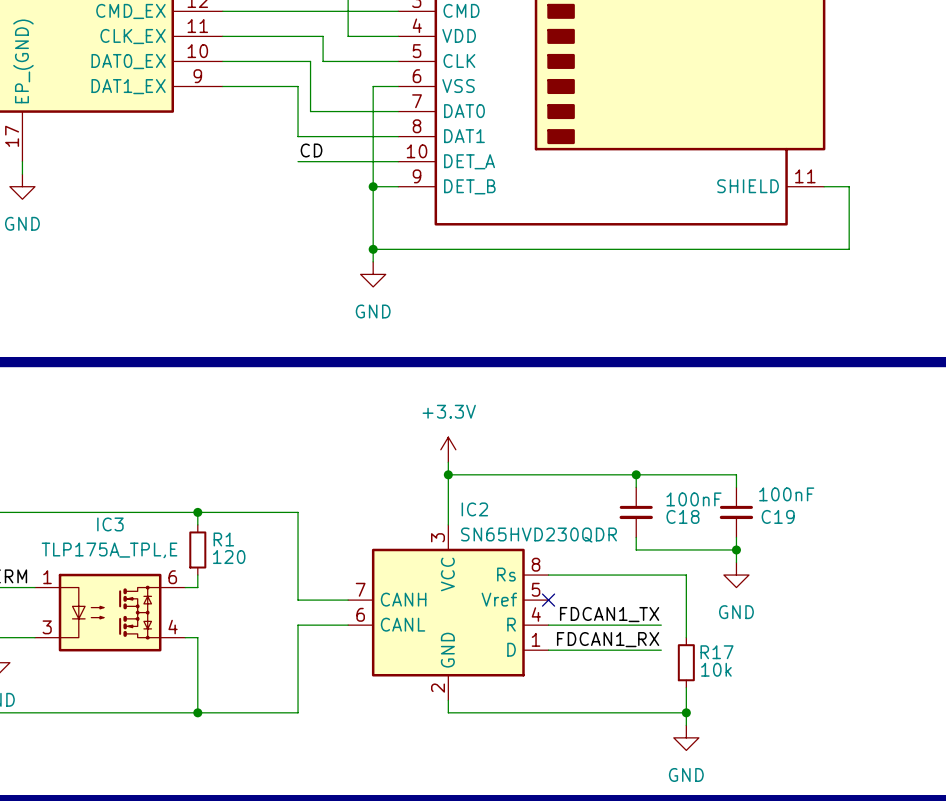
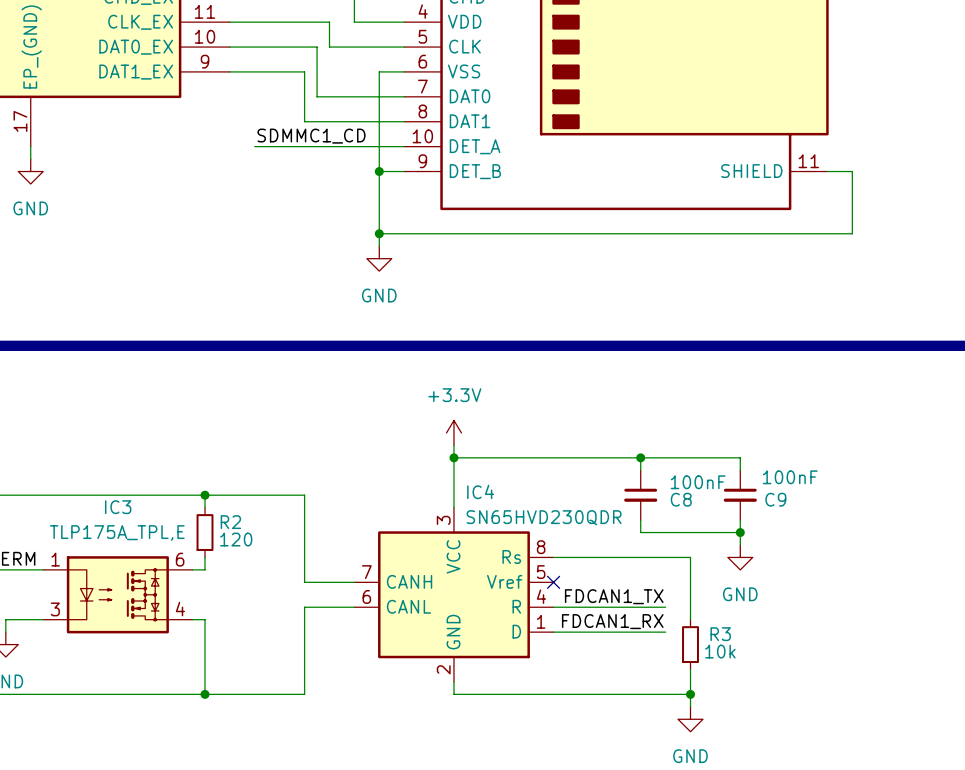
label: CD (311, 150) -> none
label: none -> SDMMC1_CD (311, 136)
wire: none -> (254, 146) (304, 146)
IC2 name: IC2 (474, 509) -> IC4 (480, 491)
C18 name: C18 (682, 516) -> C8 (681, 499)
C19 name: C19 (778, 516) -> C9 (775, 499)
R1 name: R1 (223, 539) -> R2 (230, 522)
R17 name: R17 (717, 652) -> R3 (720, 634)

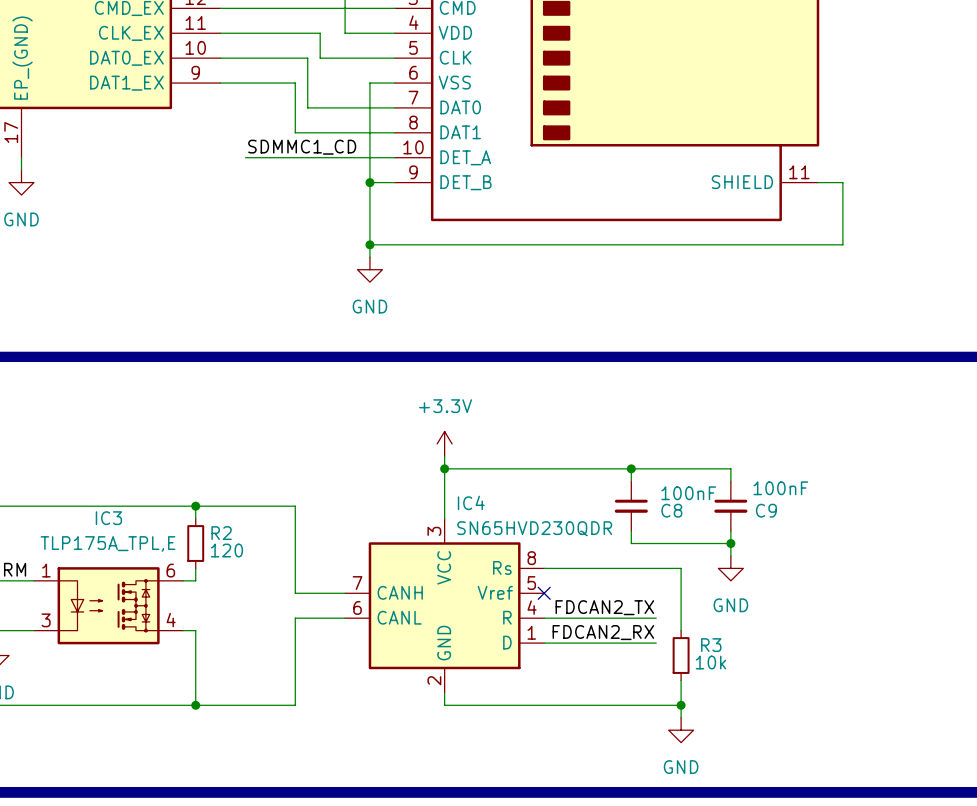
label: FDCAN1_TX (614, 596) -> FDCAN2_TX (604, 607)
label: FDCAN1_RX (612, 621) -> FDCAN2_RX (603, 632)

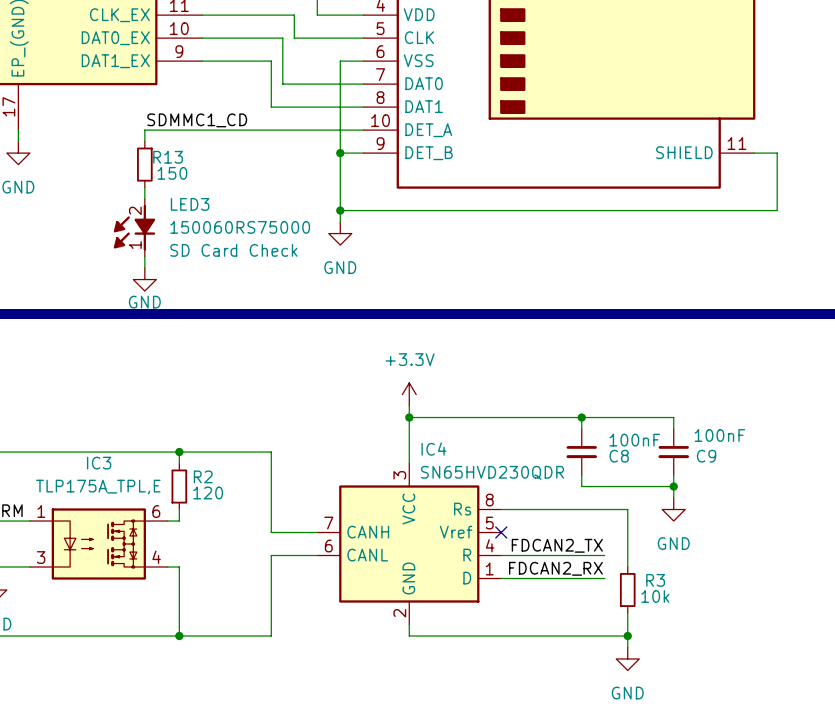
label position: SDMMC1_CD (302, 147) -> SDMMC1_CD (197, 120)
wire: none -> (225, 130) (144, 130) (144, 141)
R13: none -> 150 (144, 164)
wire: none -> (144, 187) (144, 199)
LED3: none -> 150060RS75000 (134, 227)
wire: none -> (144, 256) (144, 268)
power symbol: none -> GND (144, 279)

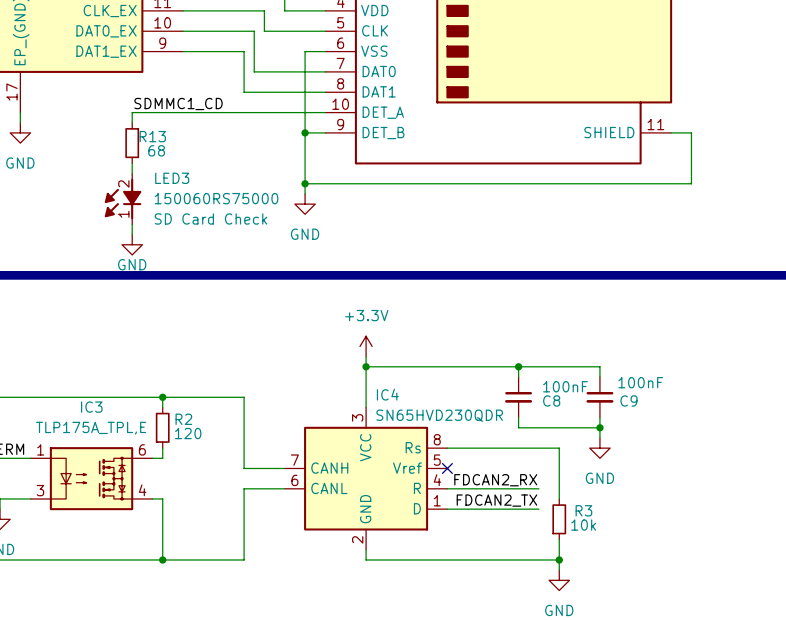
R13 value: 150 (172, 173) -> 68 (156, 150)
label: FDCAN2_TX (557, 545) -> FDCAN2_RX (495, 480)
label: FDCAN2_RX (555, 568) -> FDCAN2_TX (496, 500)

